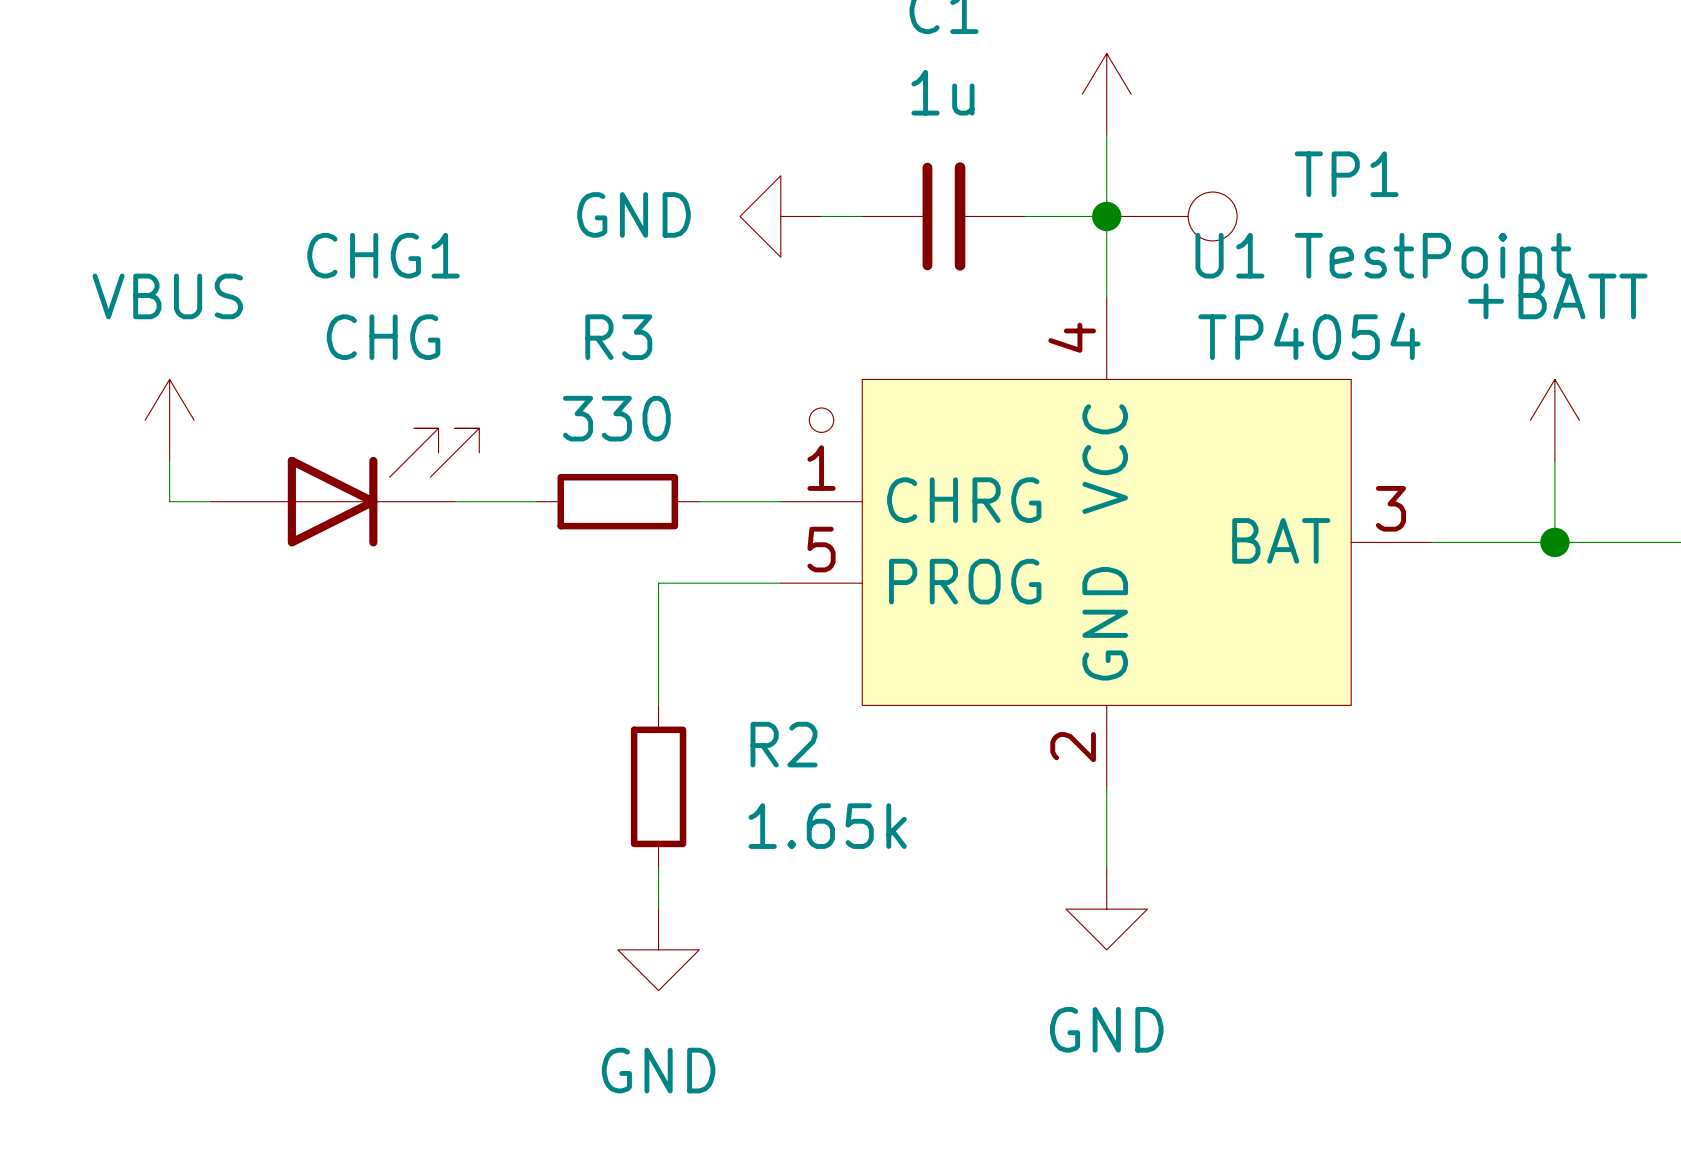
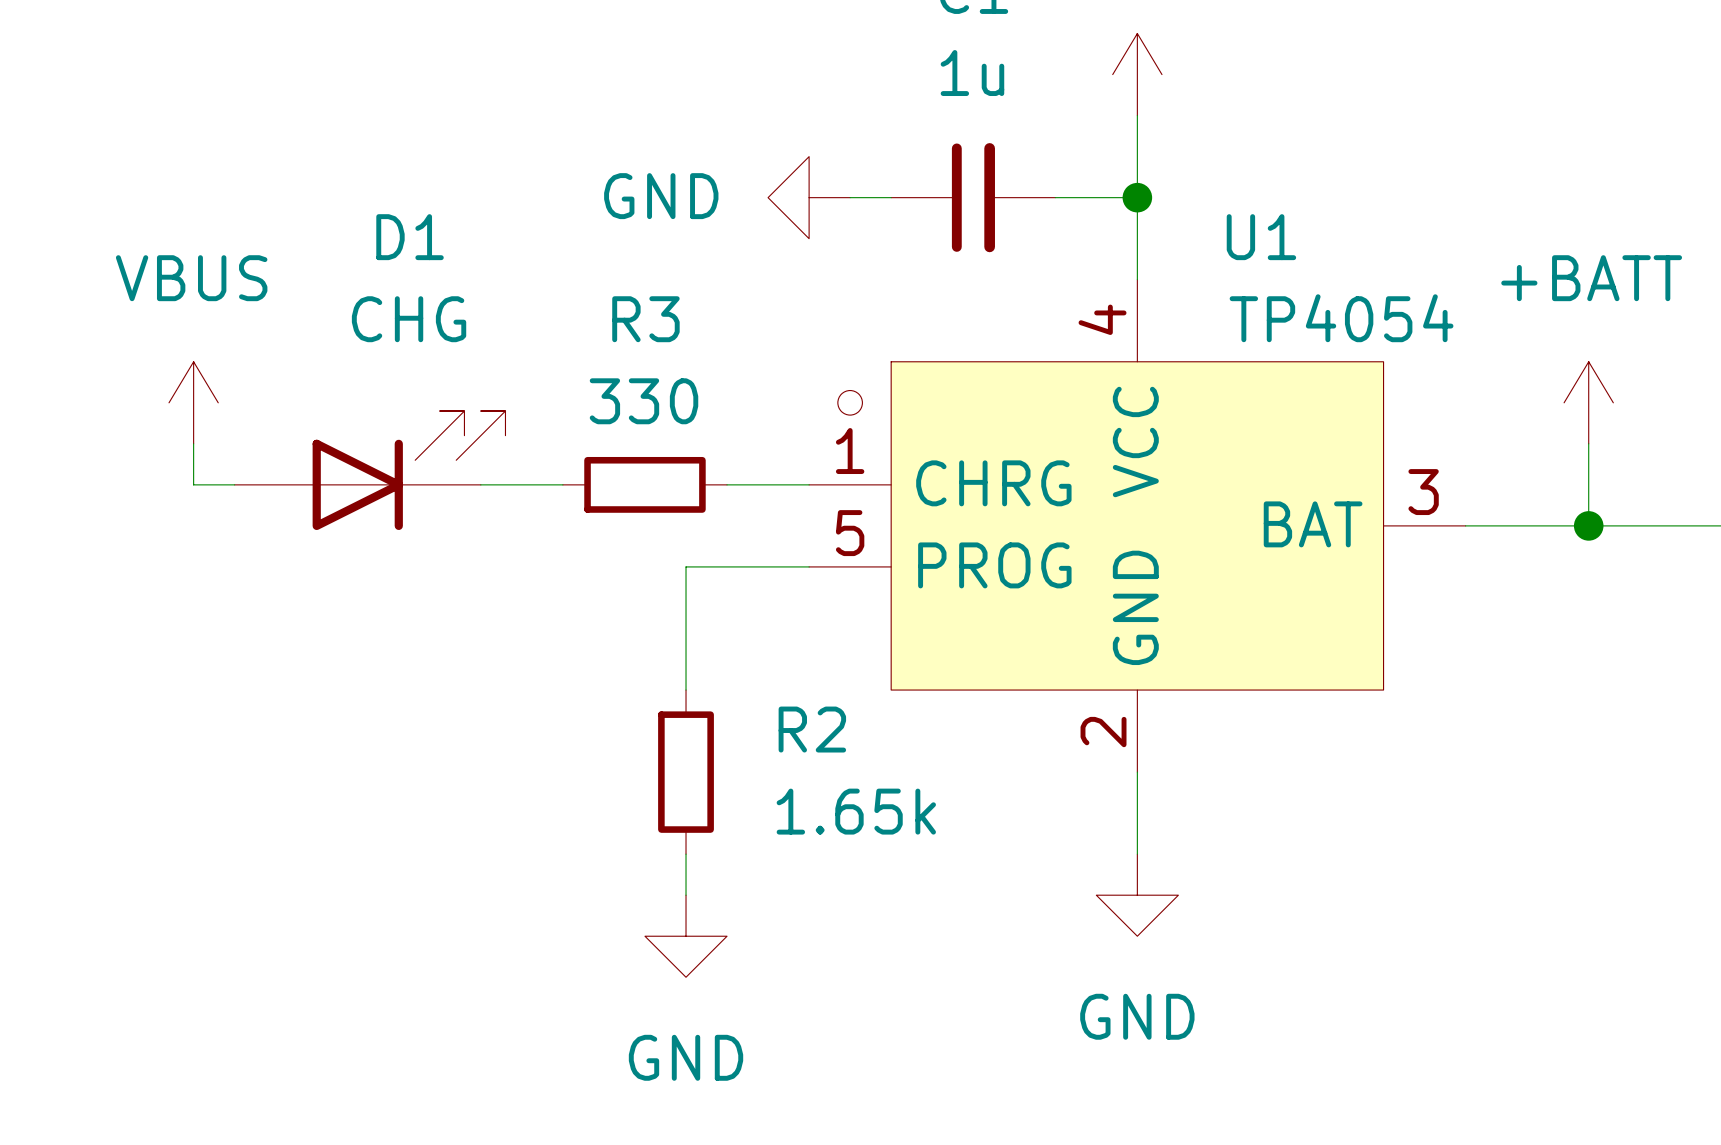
TP1: TestPoint (1171, 216) -> none
CHG1 name: CHG1 (383, 255) -> D1 (410, 237)

